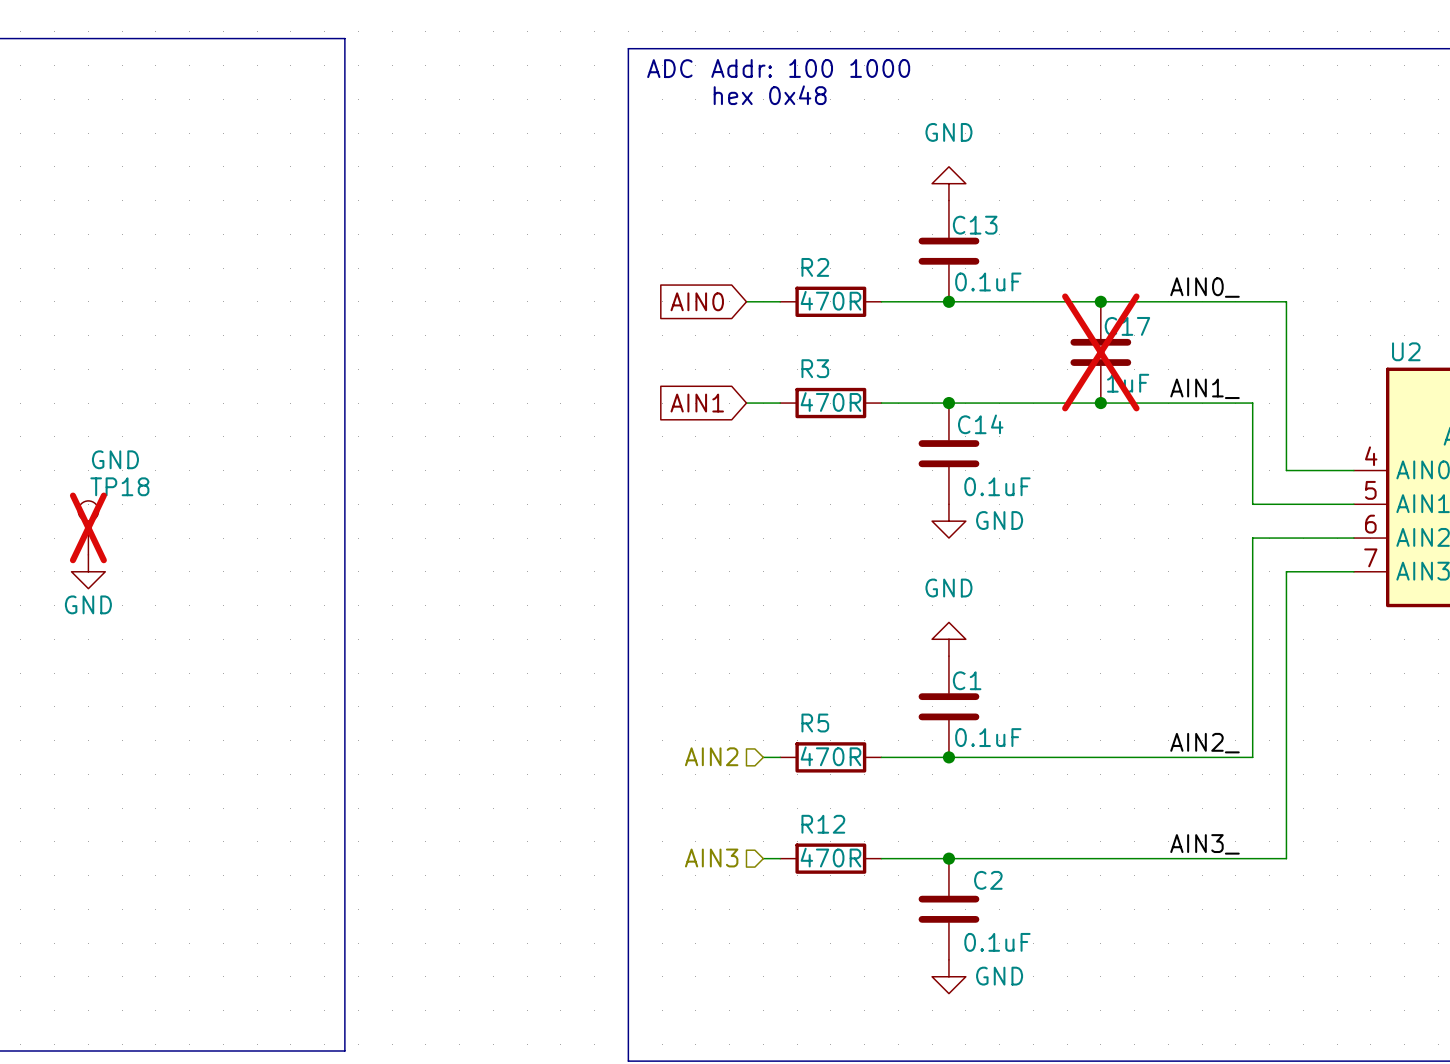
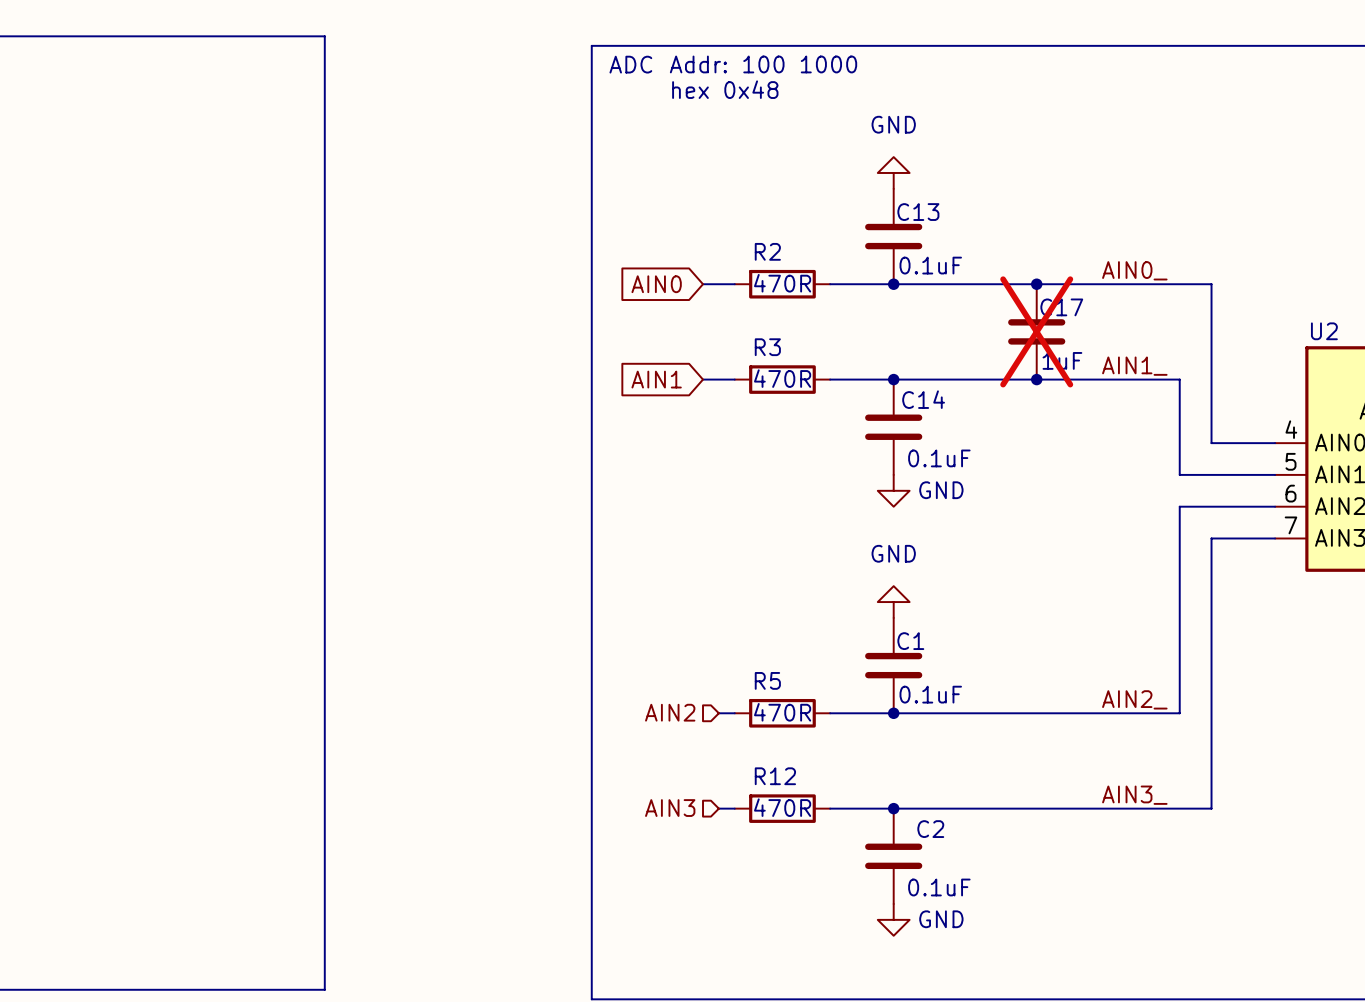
TP18: GND (88, 527) -> none
power symbol: GND (88, 571) -> none

